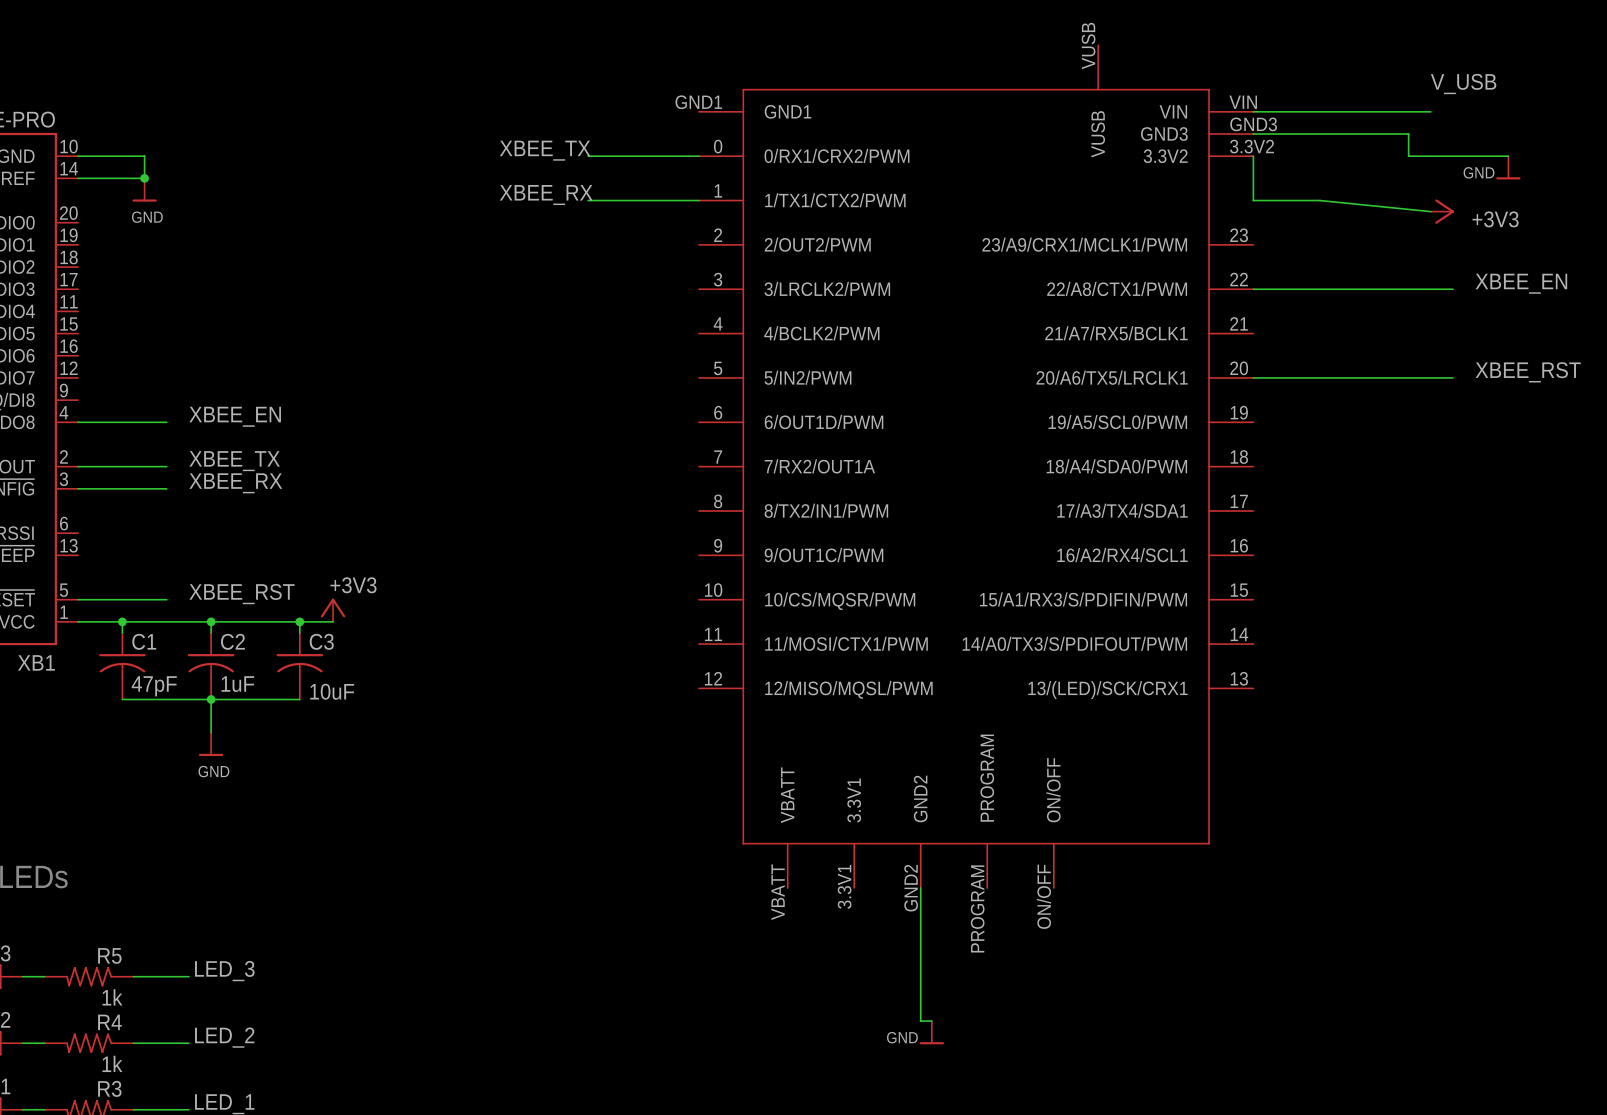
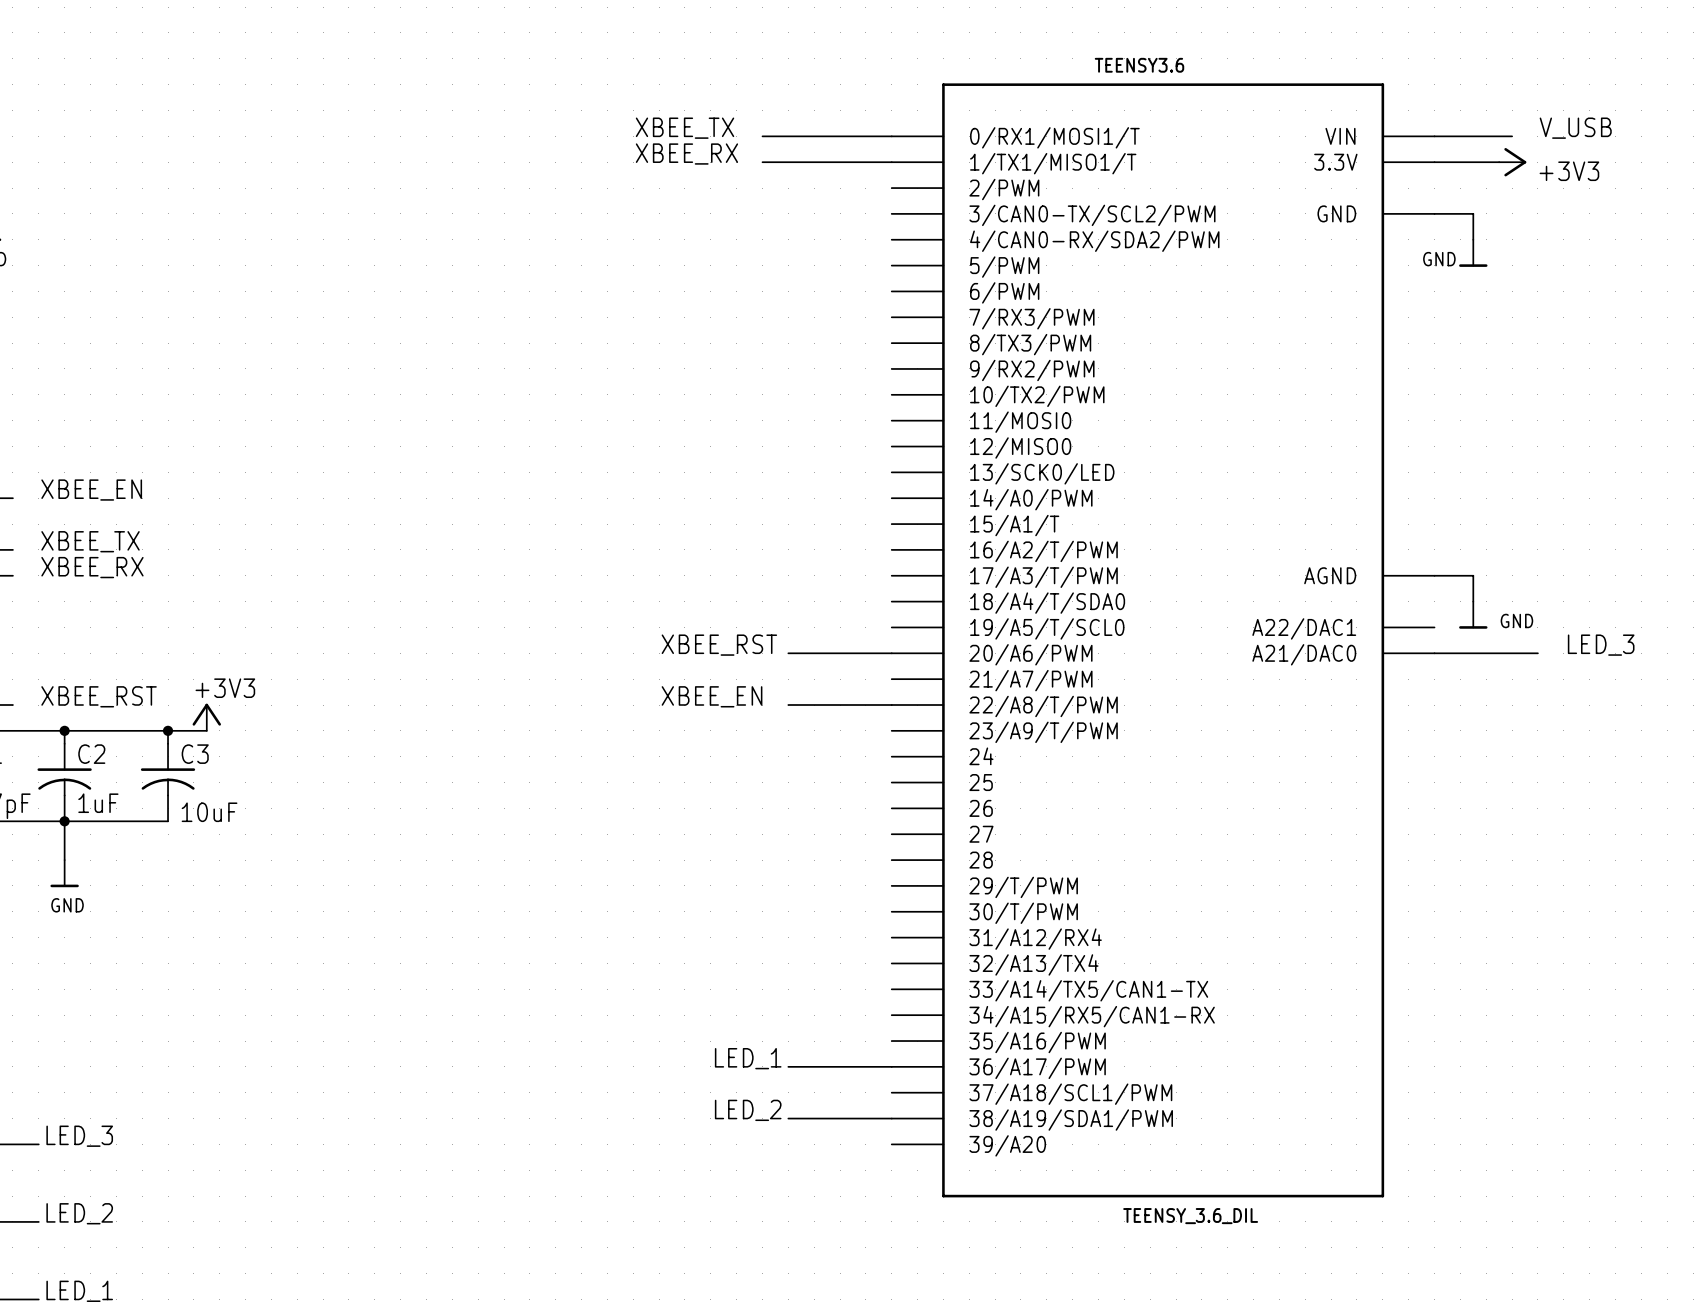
label position: V_USB (1463, 84) -> V_USB (1575, 128)
wire: none -> (762, 136) (891, 136)
wire: (1253, 111) (1386, 111) -> none
wire: none -> (1486, 136) (1512, 136)
wire: none -> (762, 162) (891, 162)
wire: (1253, 134) (1386, 134) -> none
wire: (1408, 134) (1408, 156) (1508, 156) -> (1460, 162) (1499, 162)
label position: XBEE_TX (545, 150) -> XBEE_TX (685, 128)
wire: (588, 156) (698, 156) -> none
wire: (1253, 156) (1253, 200) (1319, 200) (1430, 211) -> none
power symbol position: GND (1508, 167) -> GND (1473, 253)
wire: none -> (1434, 213) (1473, 213) (1473, 239)
label position: XBEE_RX (546, 195) -> XBEE_RX (686, 154)
wire: (588, 200) (698, 200) -> none
power symbol position: +3V3 (1442, 211) -> +3V3 (1512, 162)
label: XBEE_EN (1521, 283) -> none
wire: (1253, 289) (1452, 289) -> none
label: XBEE_RST (1528, 372) -> none
wire: (1253, 377) (1452, 377) -> none
part: (976, 466) -> none
wire: none -> (1434, 575) (1473, 575) (1473, 601)
power symbol: none -> GND (1473, 615)
TEENSY3.6: none -> TEENSY_3.6_DIL (1163, 640)
label: none -> XBEE_RST (719, 645)
label: none -> LED_3 (1601, 645)
wire: none -> (788, 653) (891, 653)
wire: none -> (1434, 653) (1537, 653)
label: none -> XBEE_EN (712, 696)
wire: none -> (788, 705) (891, 705)
wire: (920, 888) (920, 1021) (931, 1021) -> none
label: none -> LED_1 (748, 1058)
wire: none -> (788, 1066) (891, 1066)
label: none -> LED_2 (748, 1110)
wire: none -> (788, 1118) (891, 1118)
power symbol: GND (931, 1032) -> none

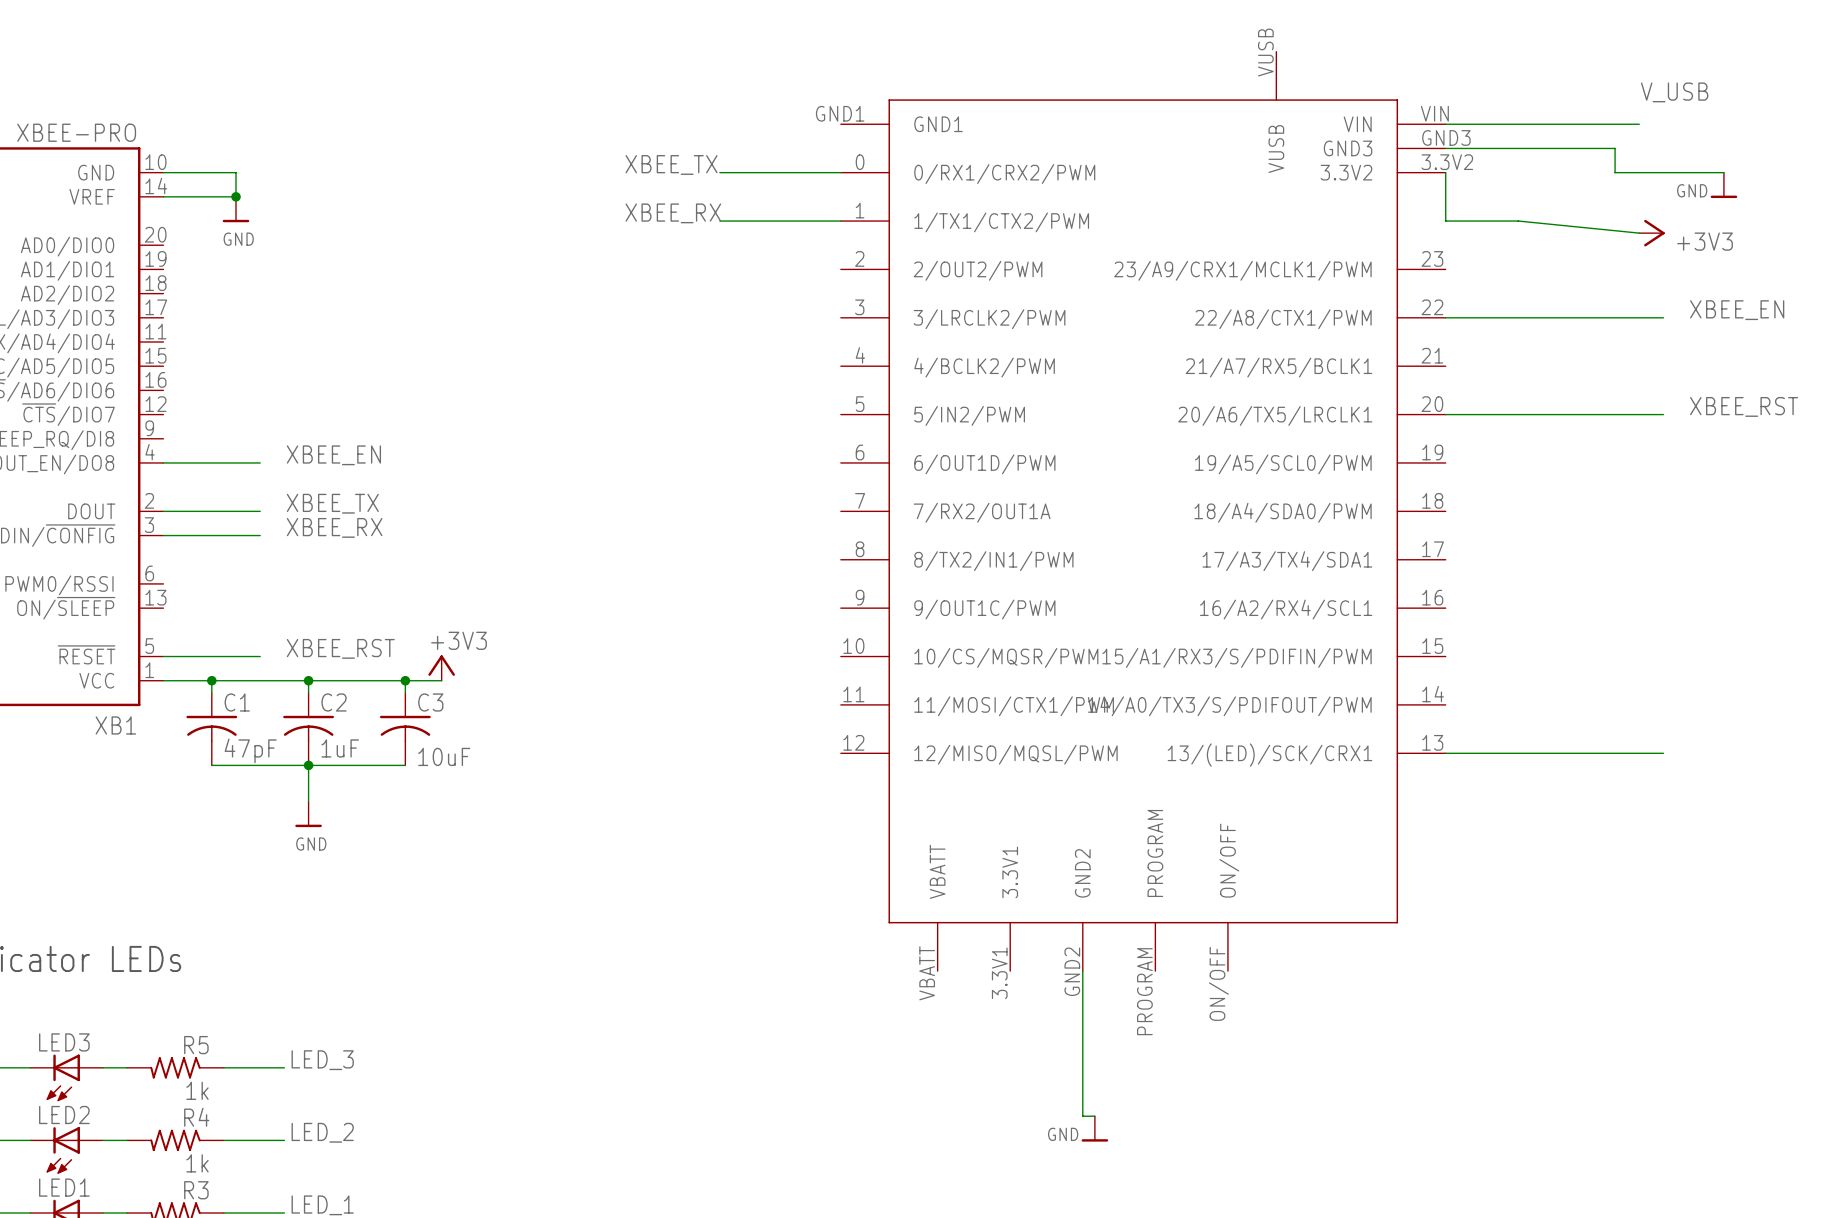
label position: XBEE_TX (685, 128) -> XBEE_TX (671, 164)
label position: V_USB (1575, 128) -> V_USB (1674, 92)
wire: (762, 136) (891, 136) -> none
wire: none -> (1445, 124) (1590, 124)
wire: (1486, 136) (1512, 136) -> none
label position: XBEE_RX (686, 154) -> XBEE_RX (673, 213)
wire: (762, 162) (891, 162) -> none
wire: none -> (1445, 148) (1590, 148)
wire: (1460, 162) (1499, 162) -> (1615, 148) (1615, 172) (1723, 172)
power symbol position: +3V3 (1512, 162) -> +3V3 (1651, 233)
wire: none -> (719, 172) (840, 172)
wire: none -> (1445, 172) (1445, 221) (1518, 221) (1639, 233)
wire: (1434, 213) (1473, 213) (1473, 239) -> none
wire: none -> (719, 221) (840, 221)
power symbol position: GND (1473, 253) -> GND (1723, 185)
label: none -> XBEE_EN (1737, 310)
wire: none -> (1445, 317) (1663, 317)
label: none -> XBEE_RST (1744, 406)
wire: none -> (1445, 414) (1663, 414)
part: none -> (1143, 511)
wire: (1434, 575) (1473, 575) (1473, 601) -> none
power symbol: GND (1473, 615) -> none
TEENSY3.6: TEENSY_3.6_DIL (1163, 640) -> none
label: XBEE_RST (719, 645) -> none
label: LED_3 (1601, 645) -> none
wire: (788, 653) (891, 653) -> none
wire: (1434, 653) (1537, 653) -> none
label: XBEE_EN (712, 696) -> none
wire: (788, 705) (891, 705) -> none
wire: none -> (1445, 753) (1663, 753)
wire: none -> (1082, 971) (1082, 1116) (1094, 1116)
label: LED_1 (748, 1058) -> none
wire: (788, 1066) (891, 1066) -> none
label: LED_2 (748, 1110) -> none
wire: (788, 1118) (891, 1118) -> none
power symbol: none -> GND (1094, 1128)

